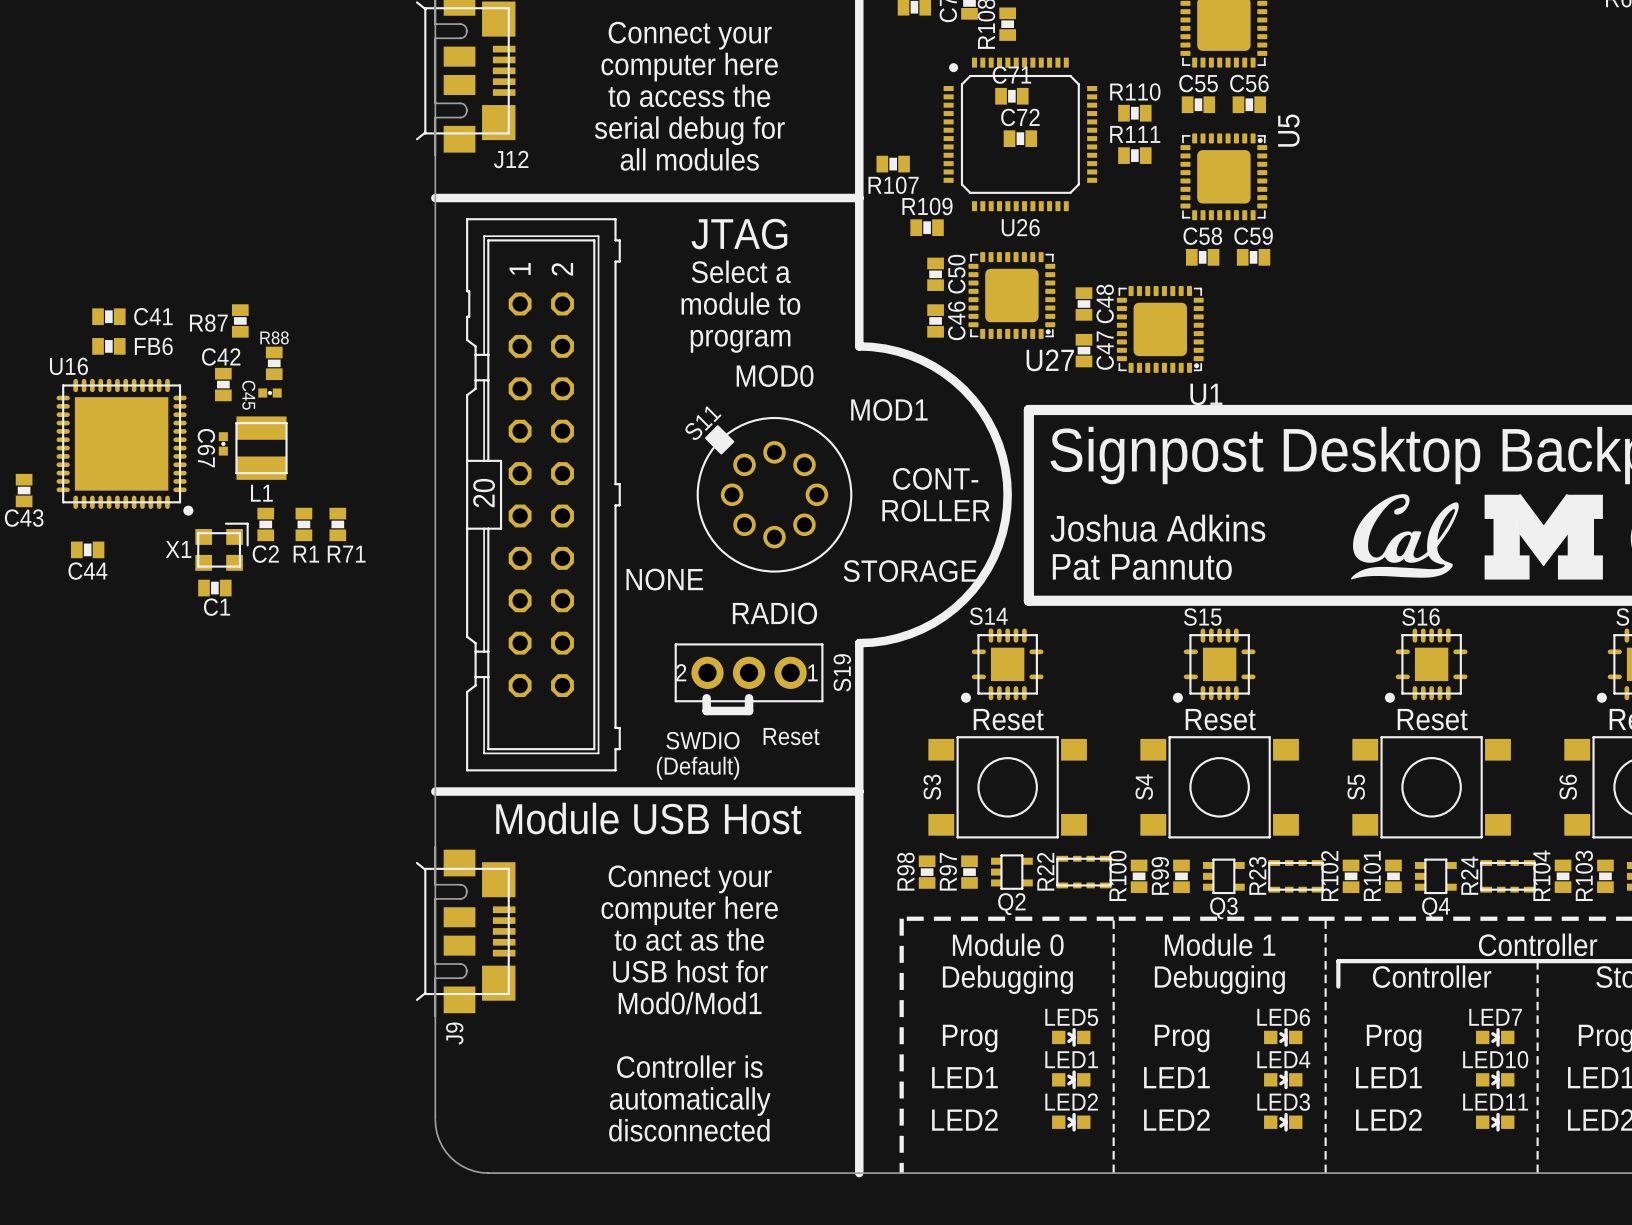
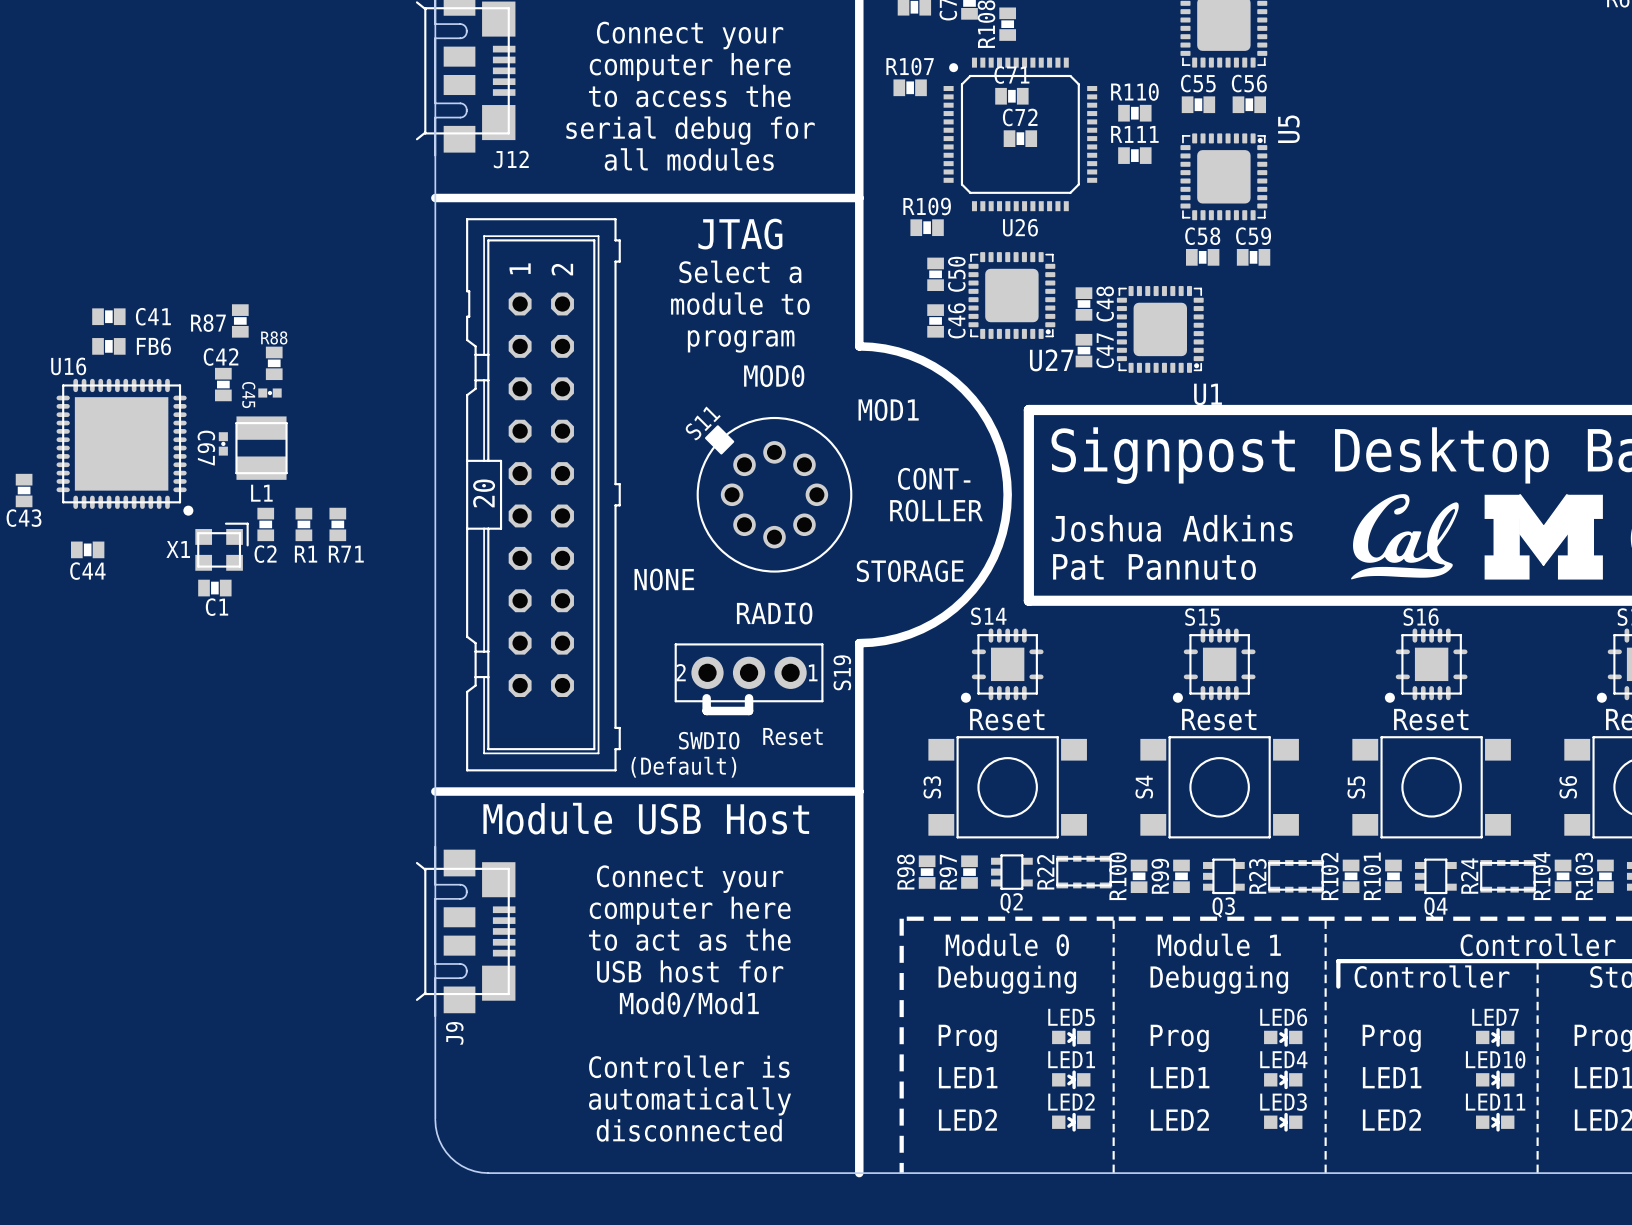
R107 position: (893, 164) -> (910, 87)
R107 name position: R107 (893, 185) -> R107 (910, 66)

